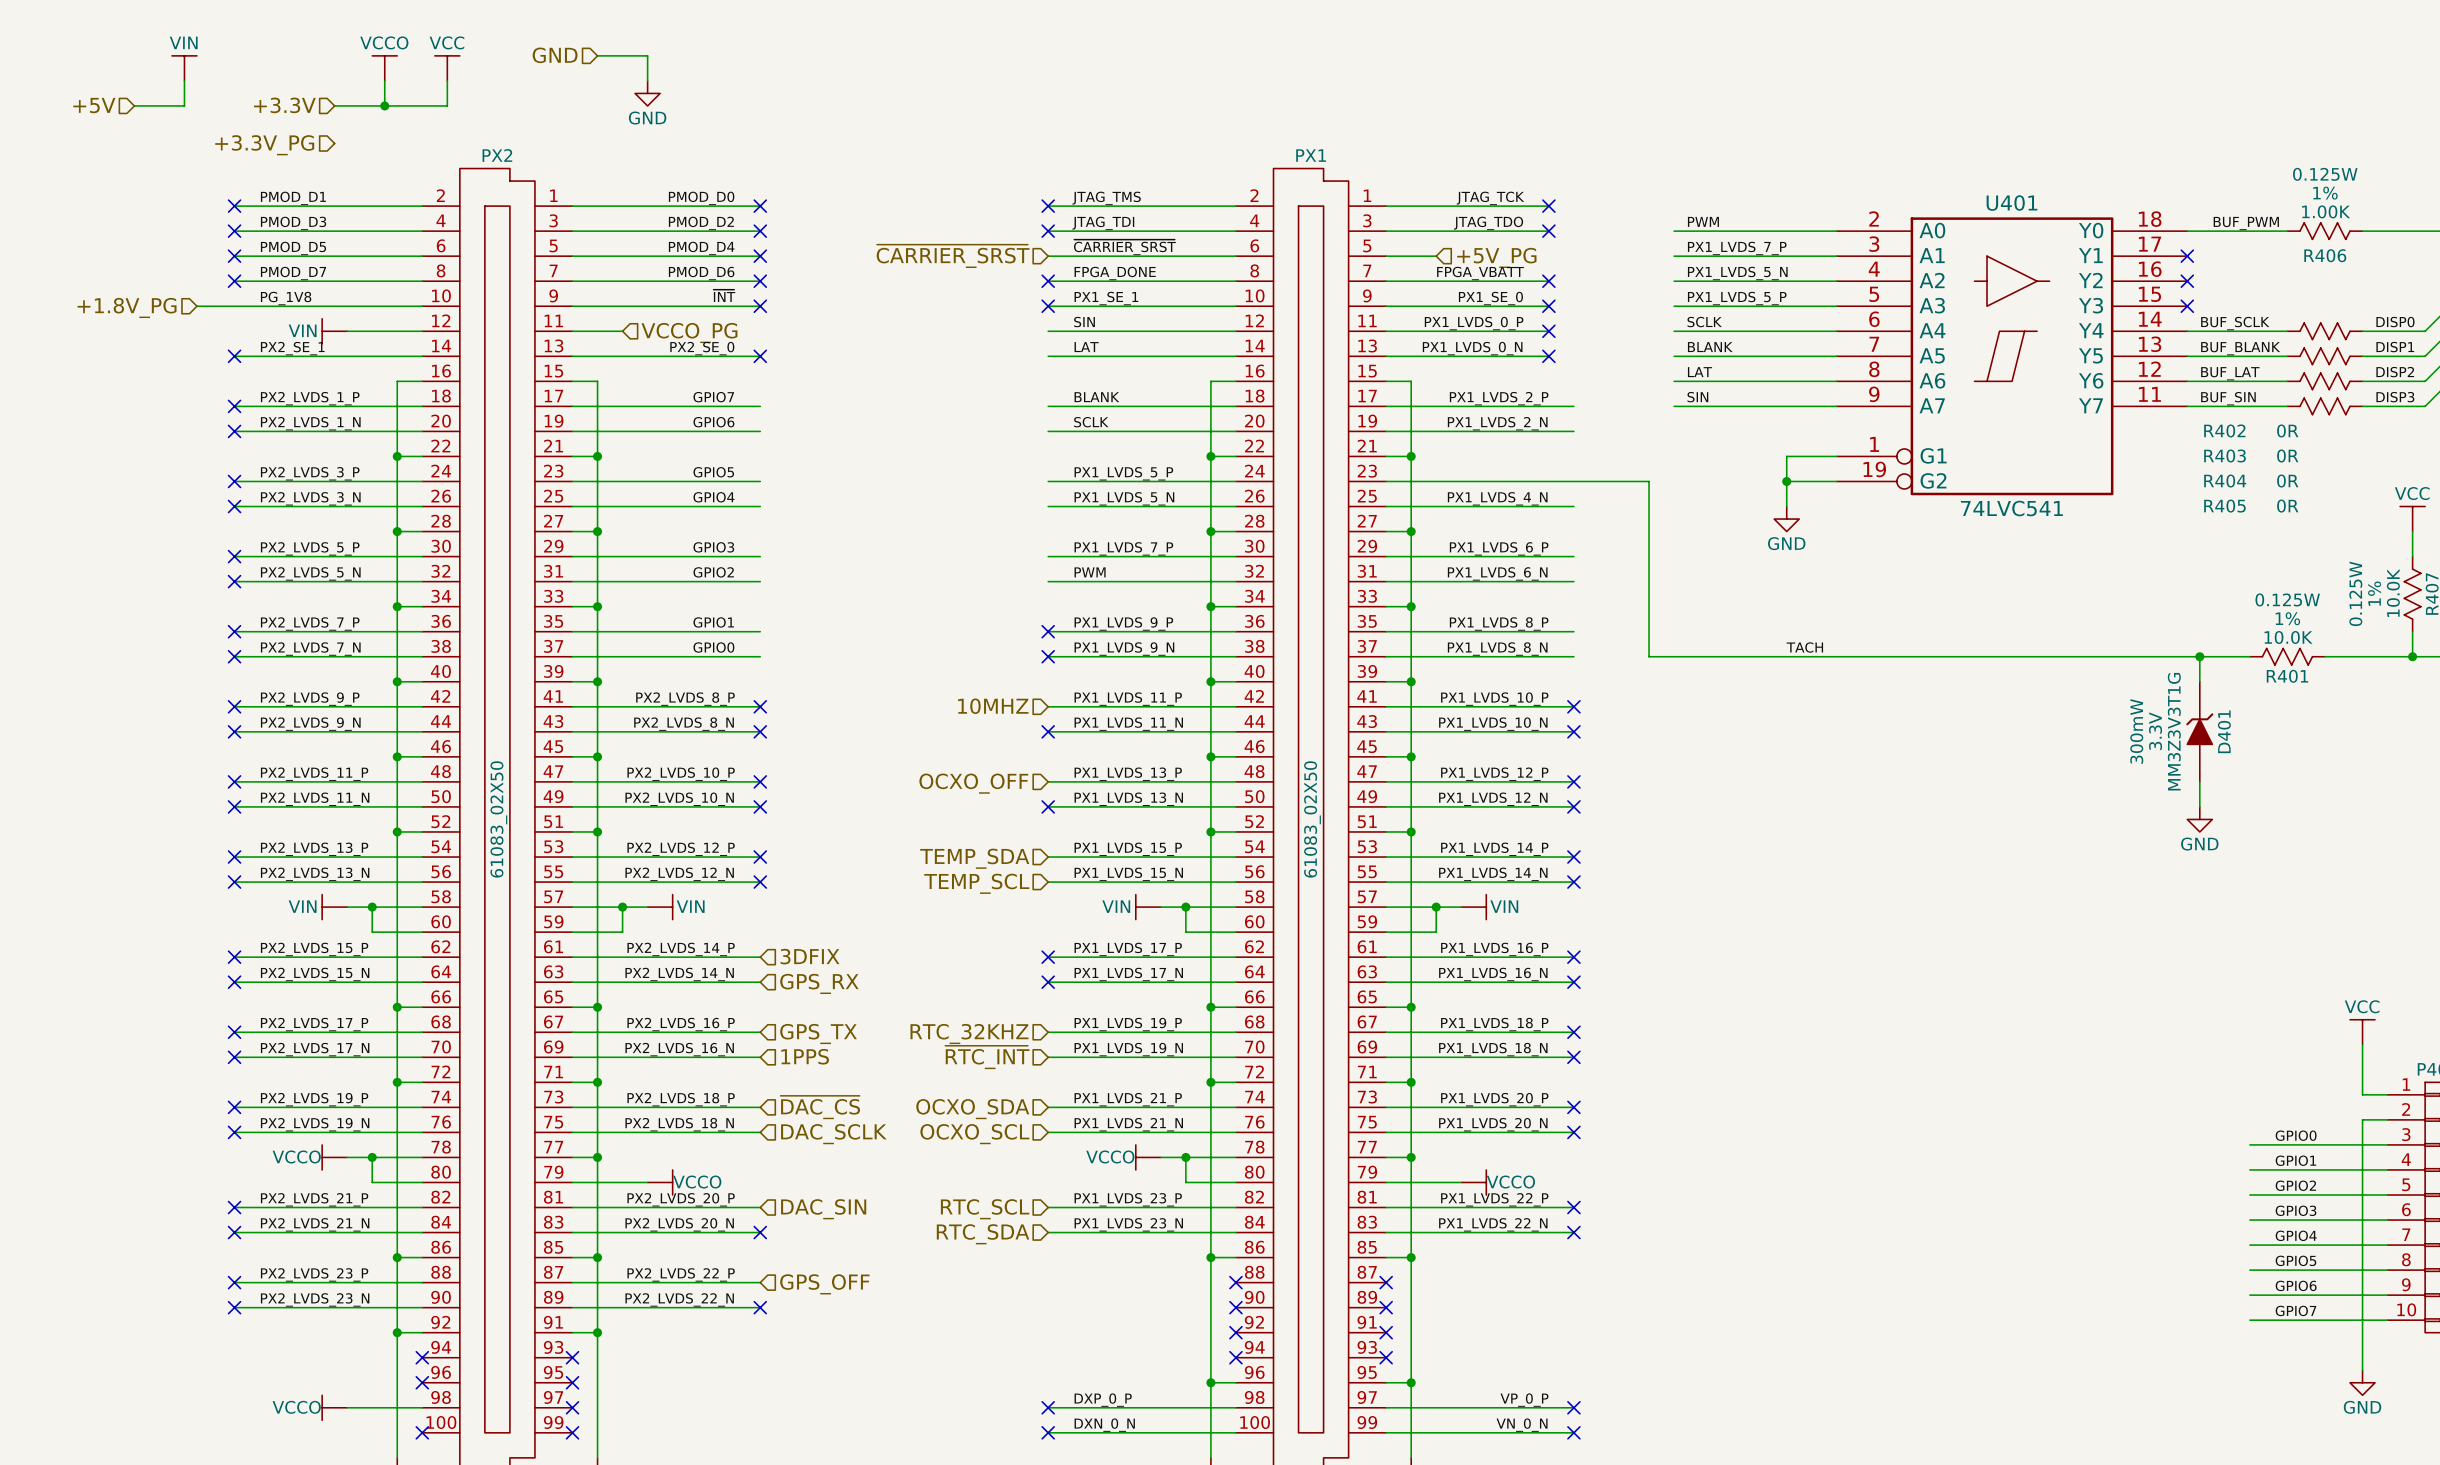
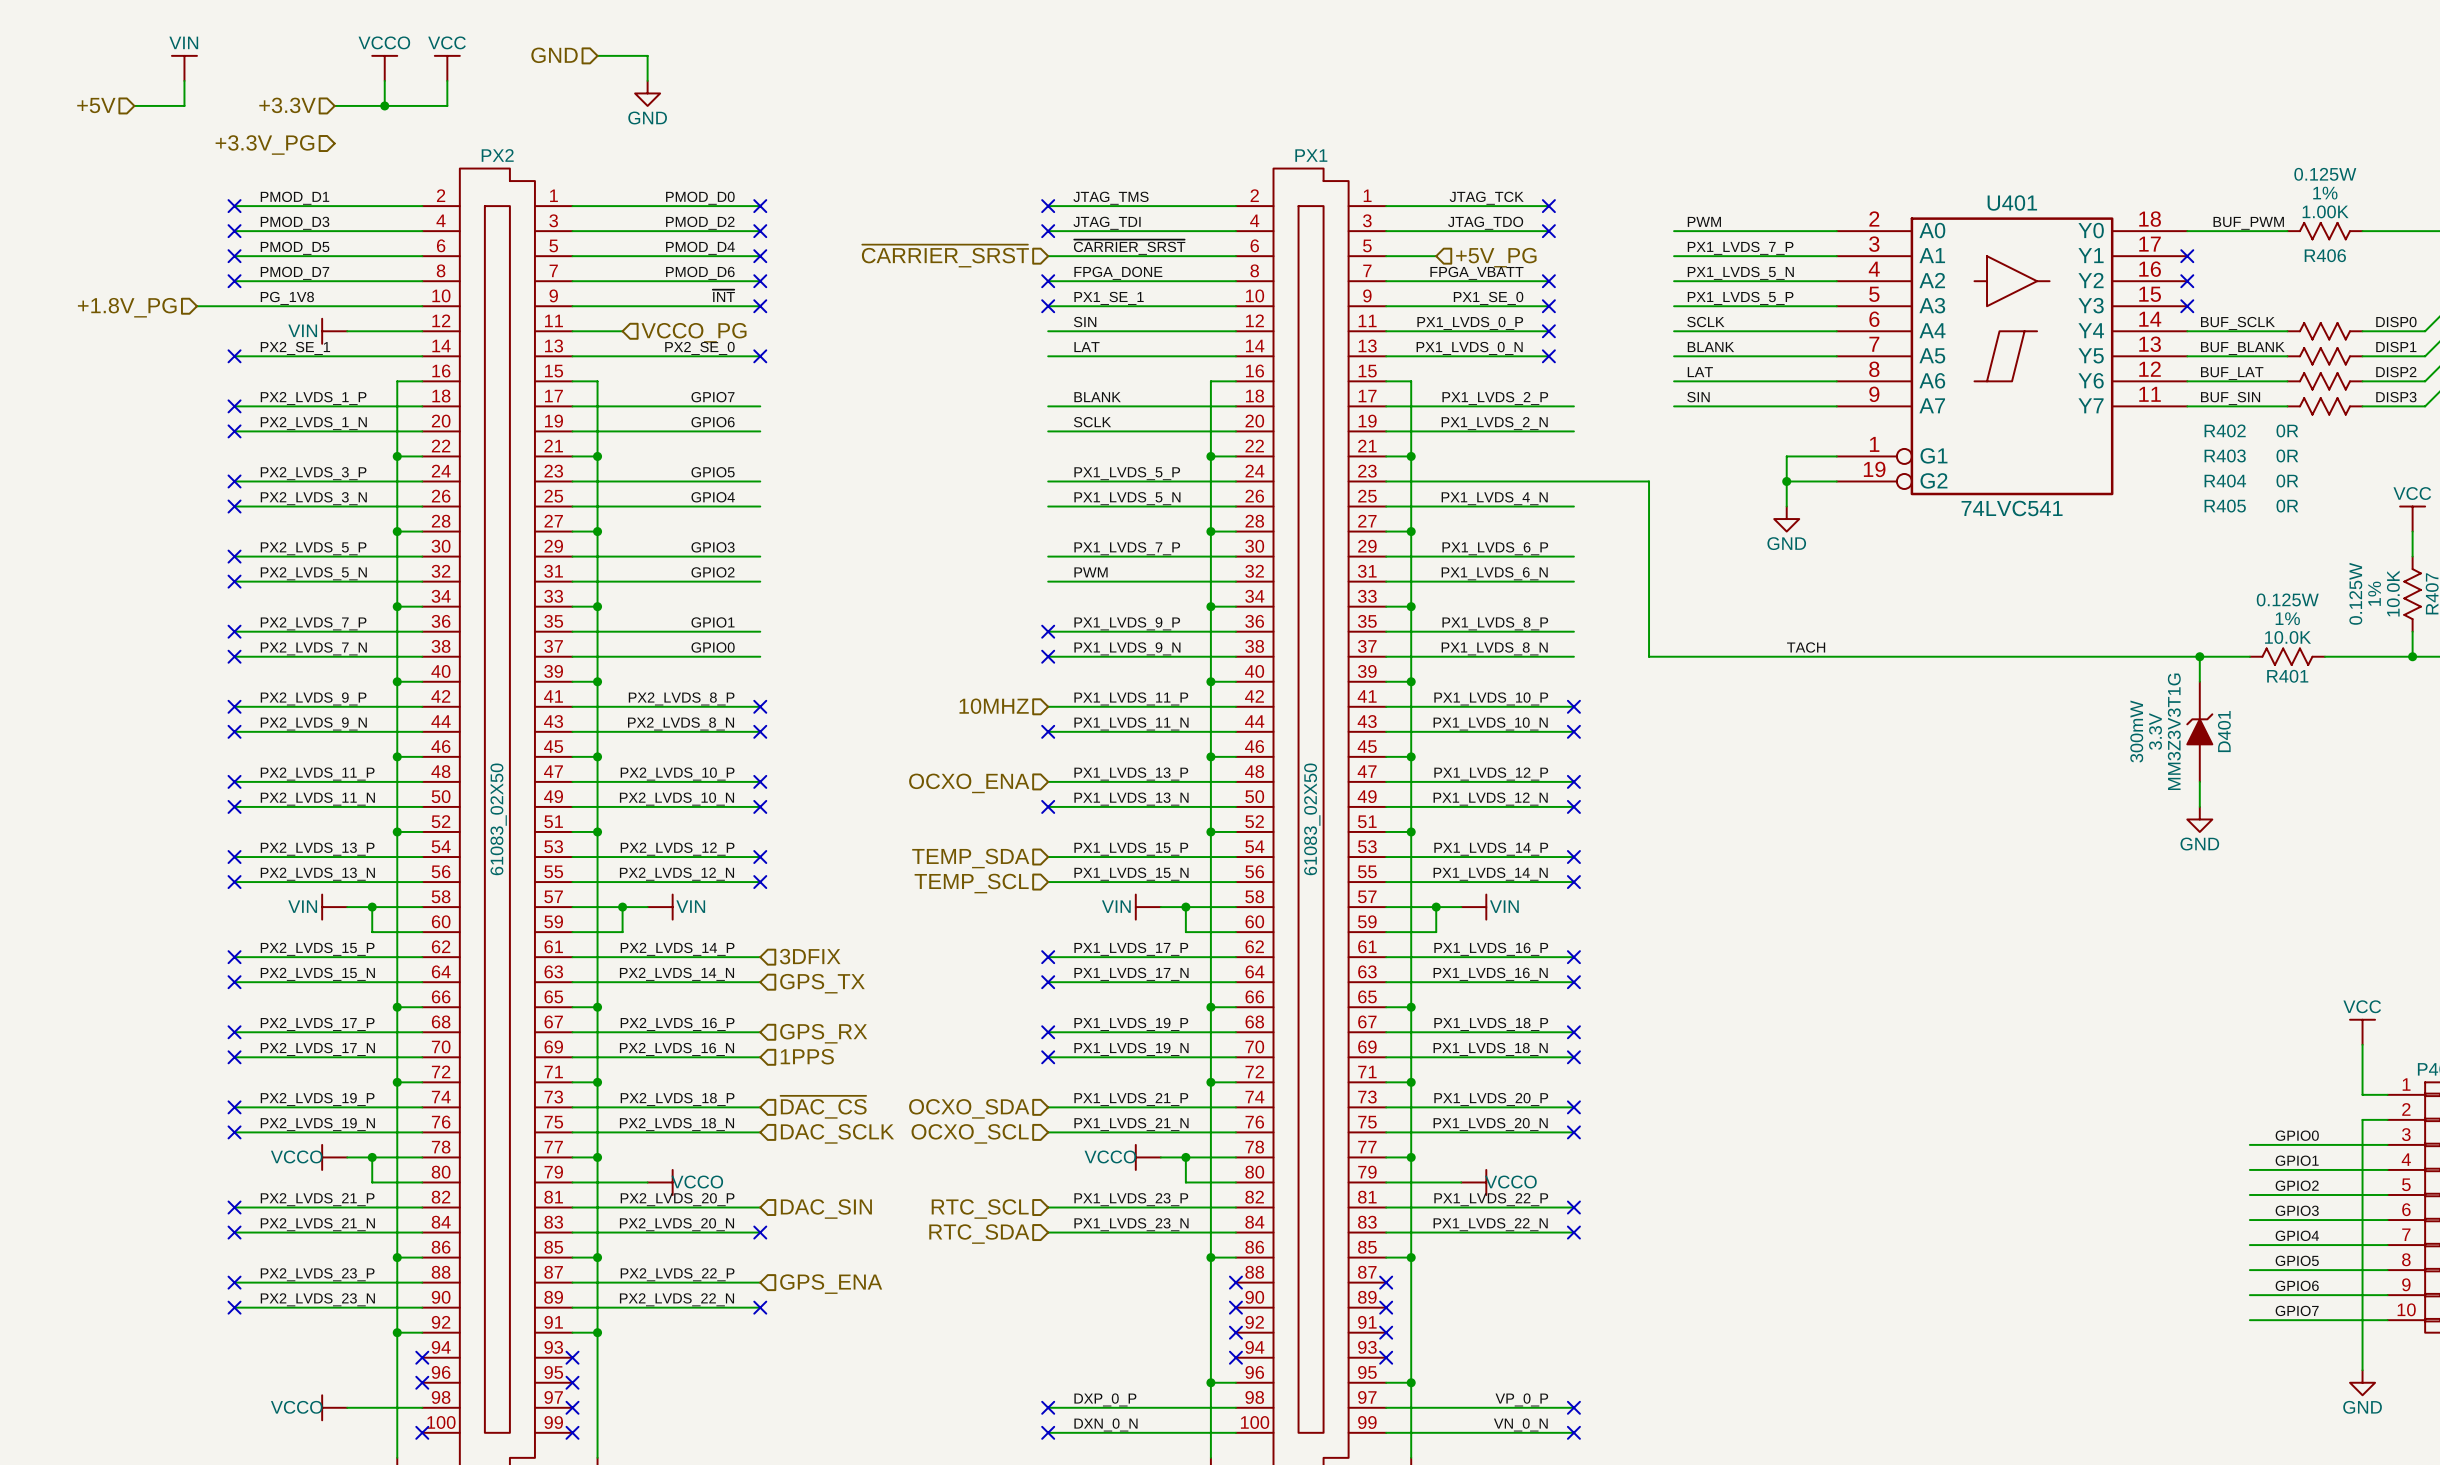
hierarchical label: OCXO_OFF (973, 783) -> OCXO_ENA (969, 783)
hierarchical label: GPS_RX (819, 983) -> GPS_TX (822, 983)
no-connect mark: none -> (1048, 1032)
hierarchical label: GPS_TX (818, 1033) -> GPS_RX (823, 1033)
hierarchical label: RTC_32KHZ (969, 1033) -> none
hierarchical label: ~{RTC_INT} (987, 1057) -> none
no-connect mark: none -> (1048, 1057)
hierarchical label: GPS_OFF (824, 1284) -> GPS_ENA (831, 1284)

